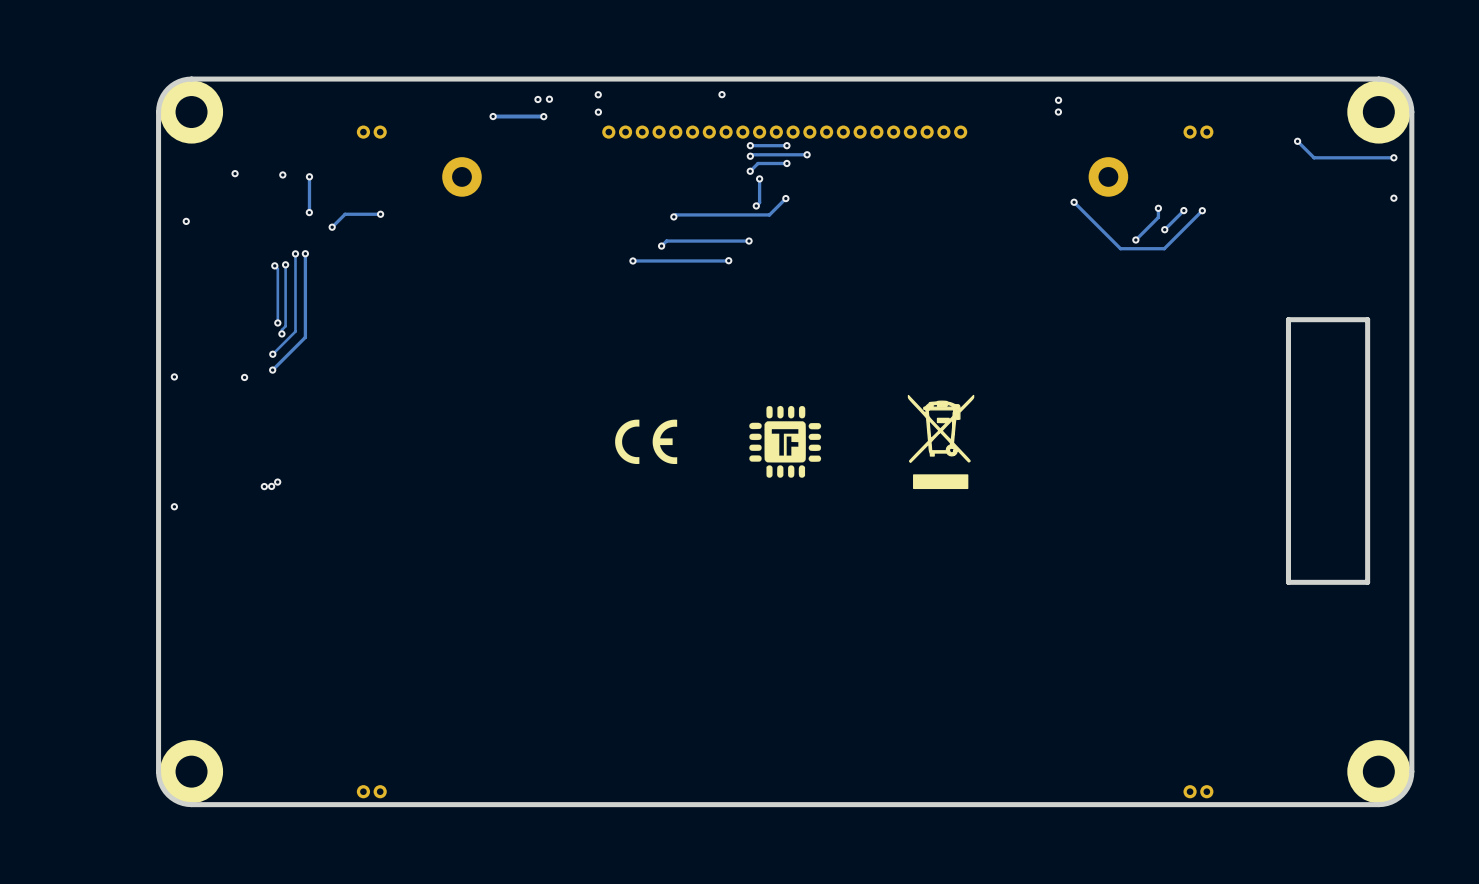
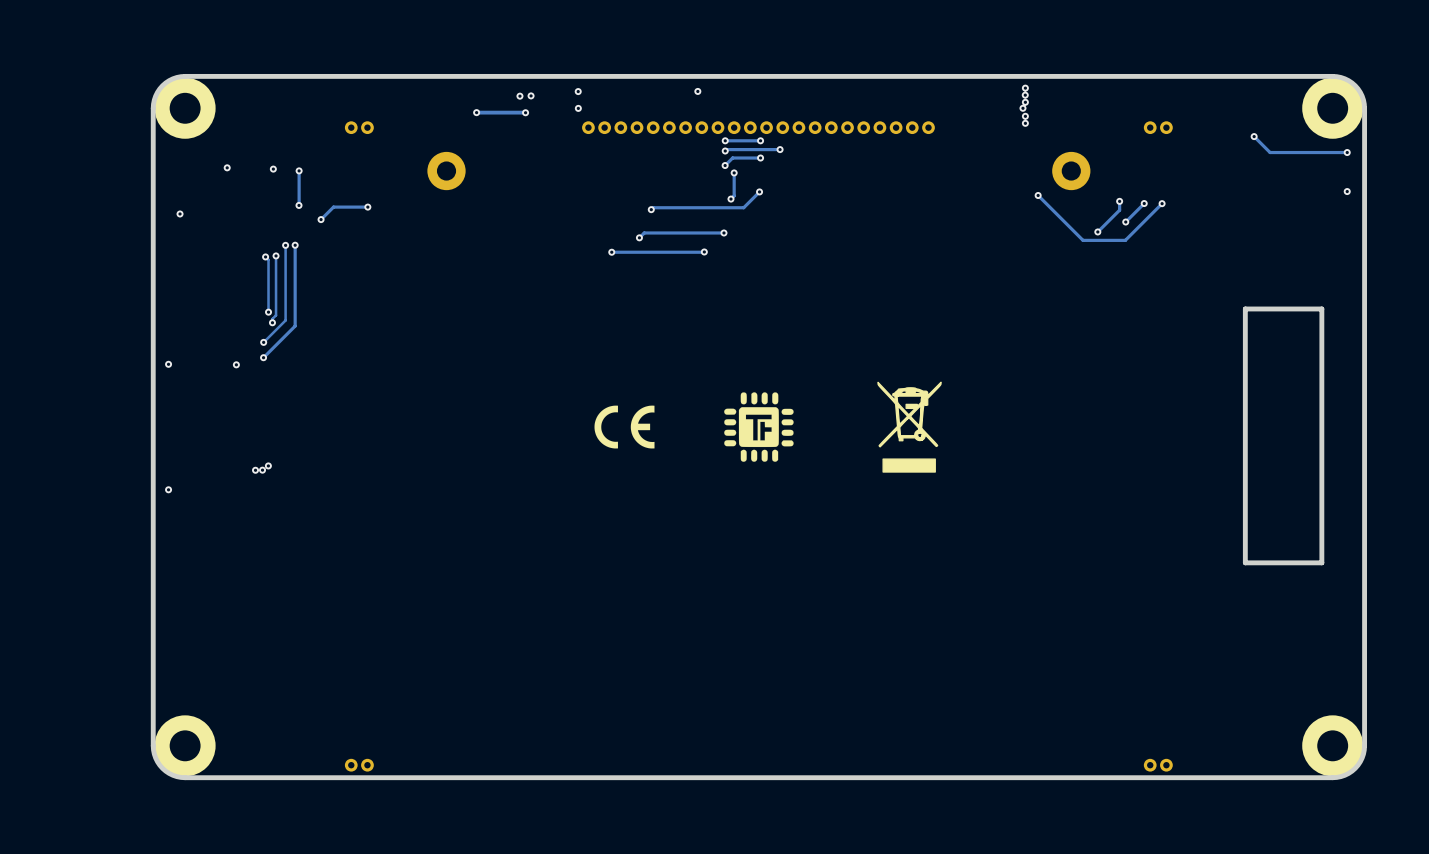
via: none -> (1025, 88)
via: none -> (1025, 95)
via: (1058, 100) -> none
via: none -> (1025, 102)
via: none -> (1025, 116)
via: none -> (1025, 123)

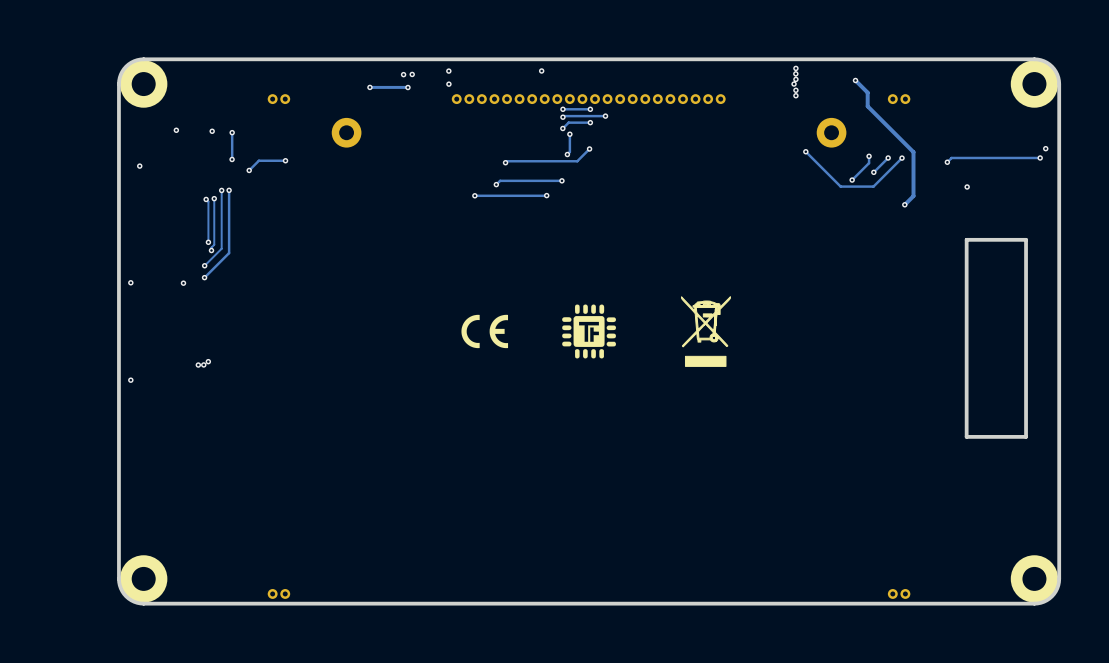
track: none -> (855, 80) (867, 92) (867, 106) (913, 152) (913, 196) (904, 204)
via: none -> (855, 80)
track: (1254, 136) (1270, 152) (1347, 152) -> none
via: (1254, 136) -> none
via position: (1347, 152) -> (1040, 157)
track: none -> (1040, 157) (951, 157) (947, 162)
via: none -> (947, 162)
via: none -> (967, 186)
via: none -> (904, 204)

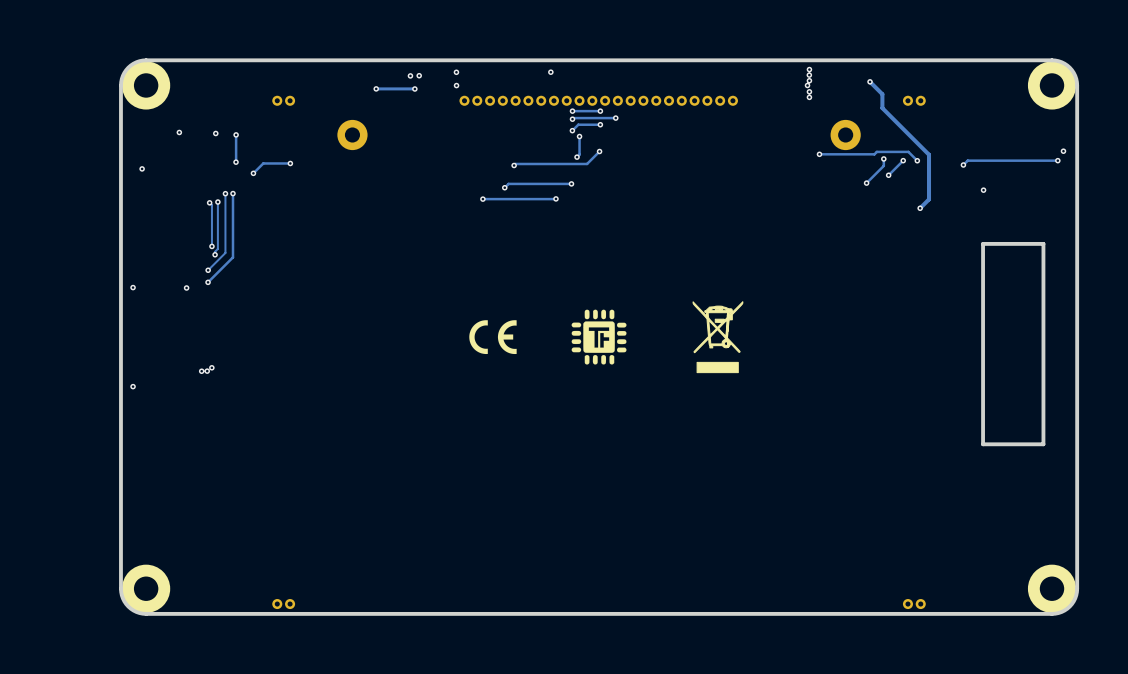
track: (805, 151) (840, 186) (873, 186) (902, 158) -> (819, 154) (908, 151) (917, 160)

